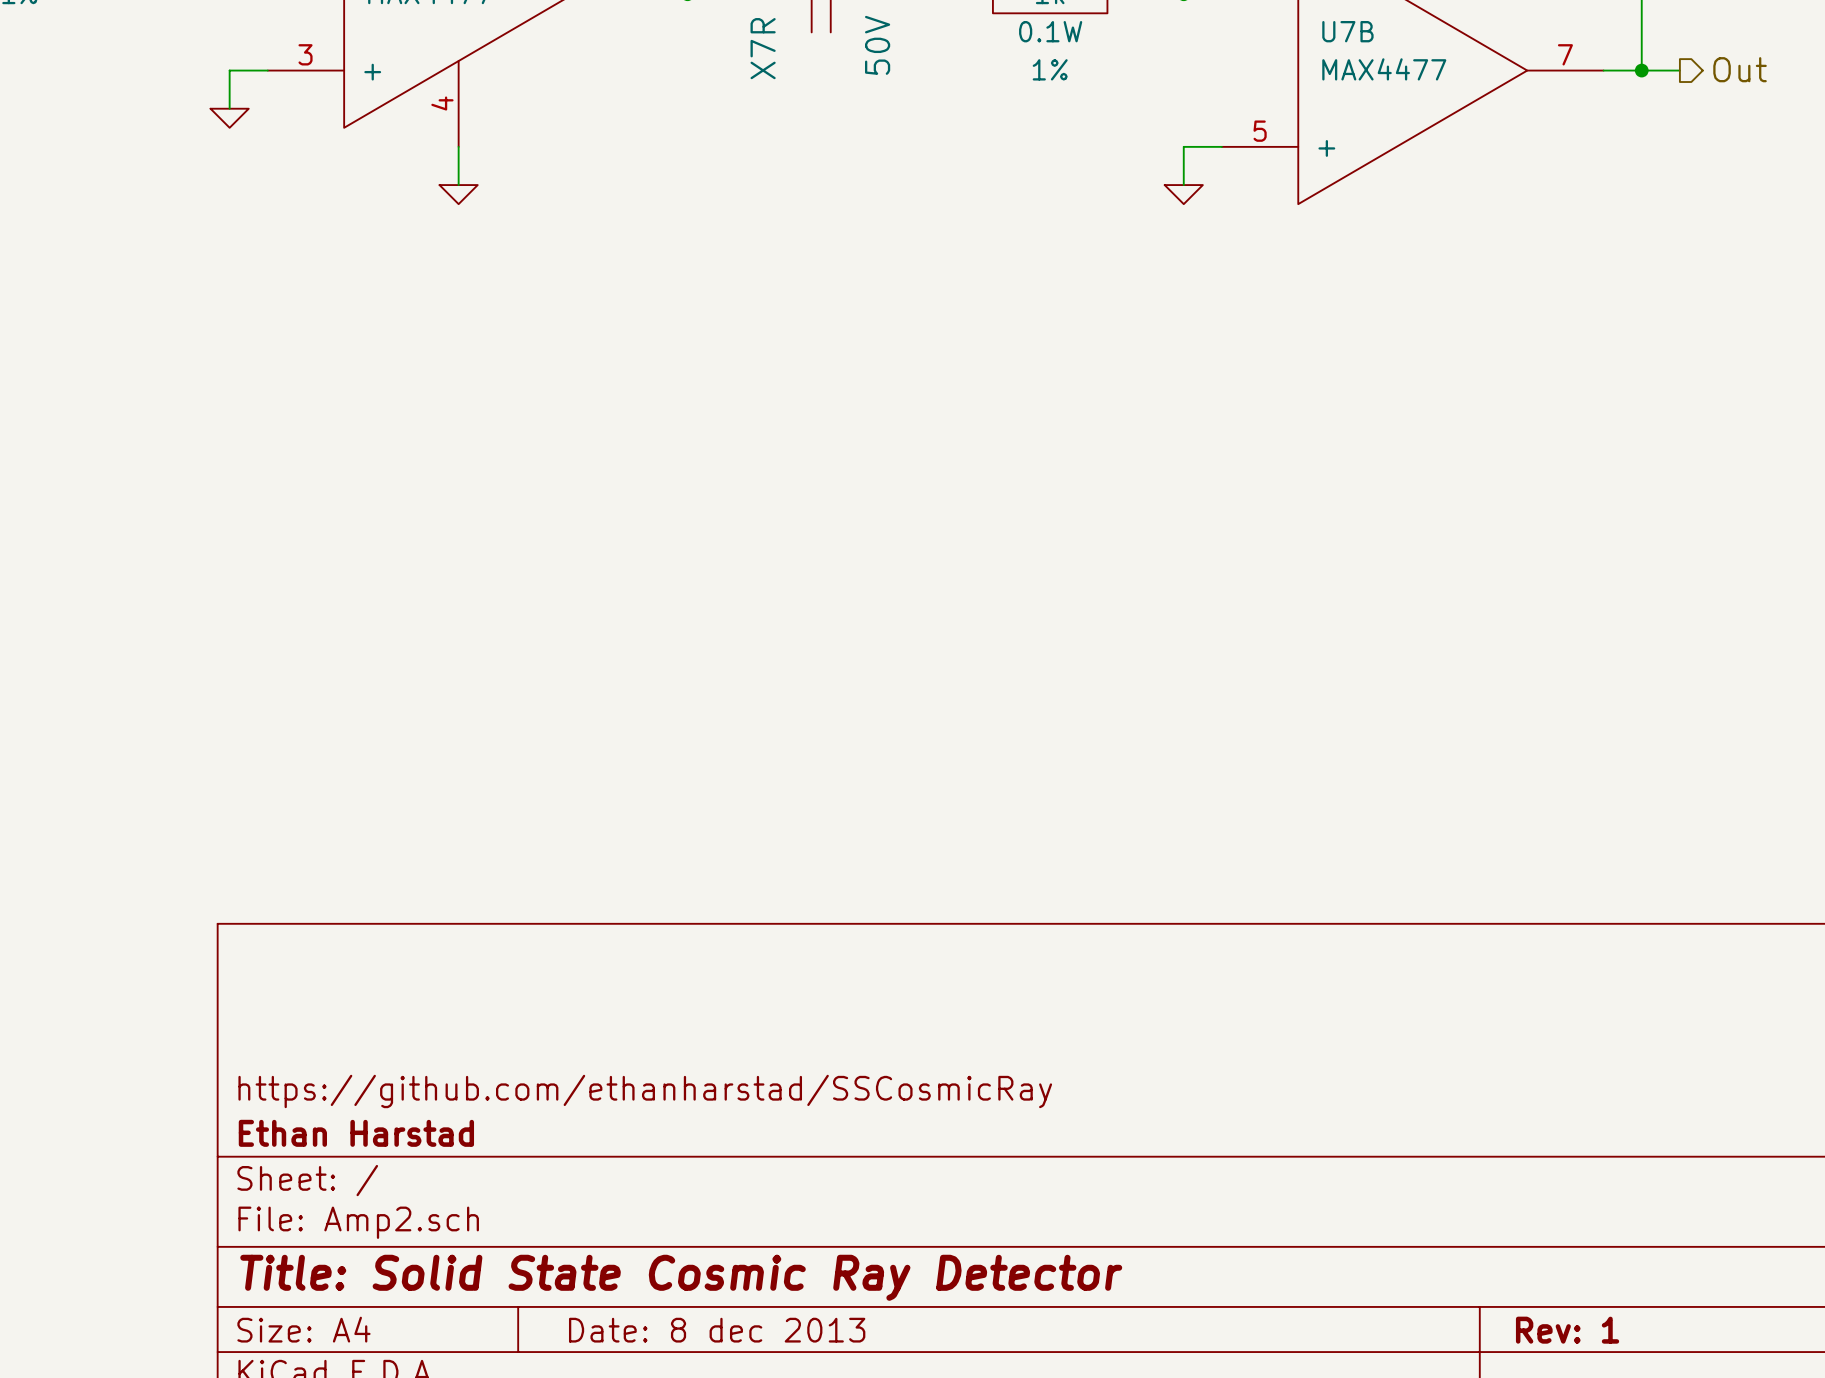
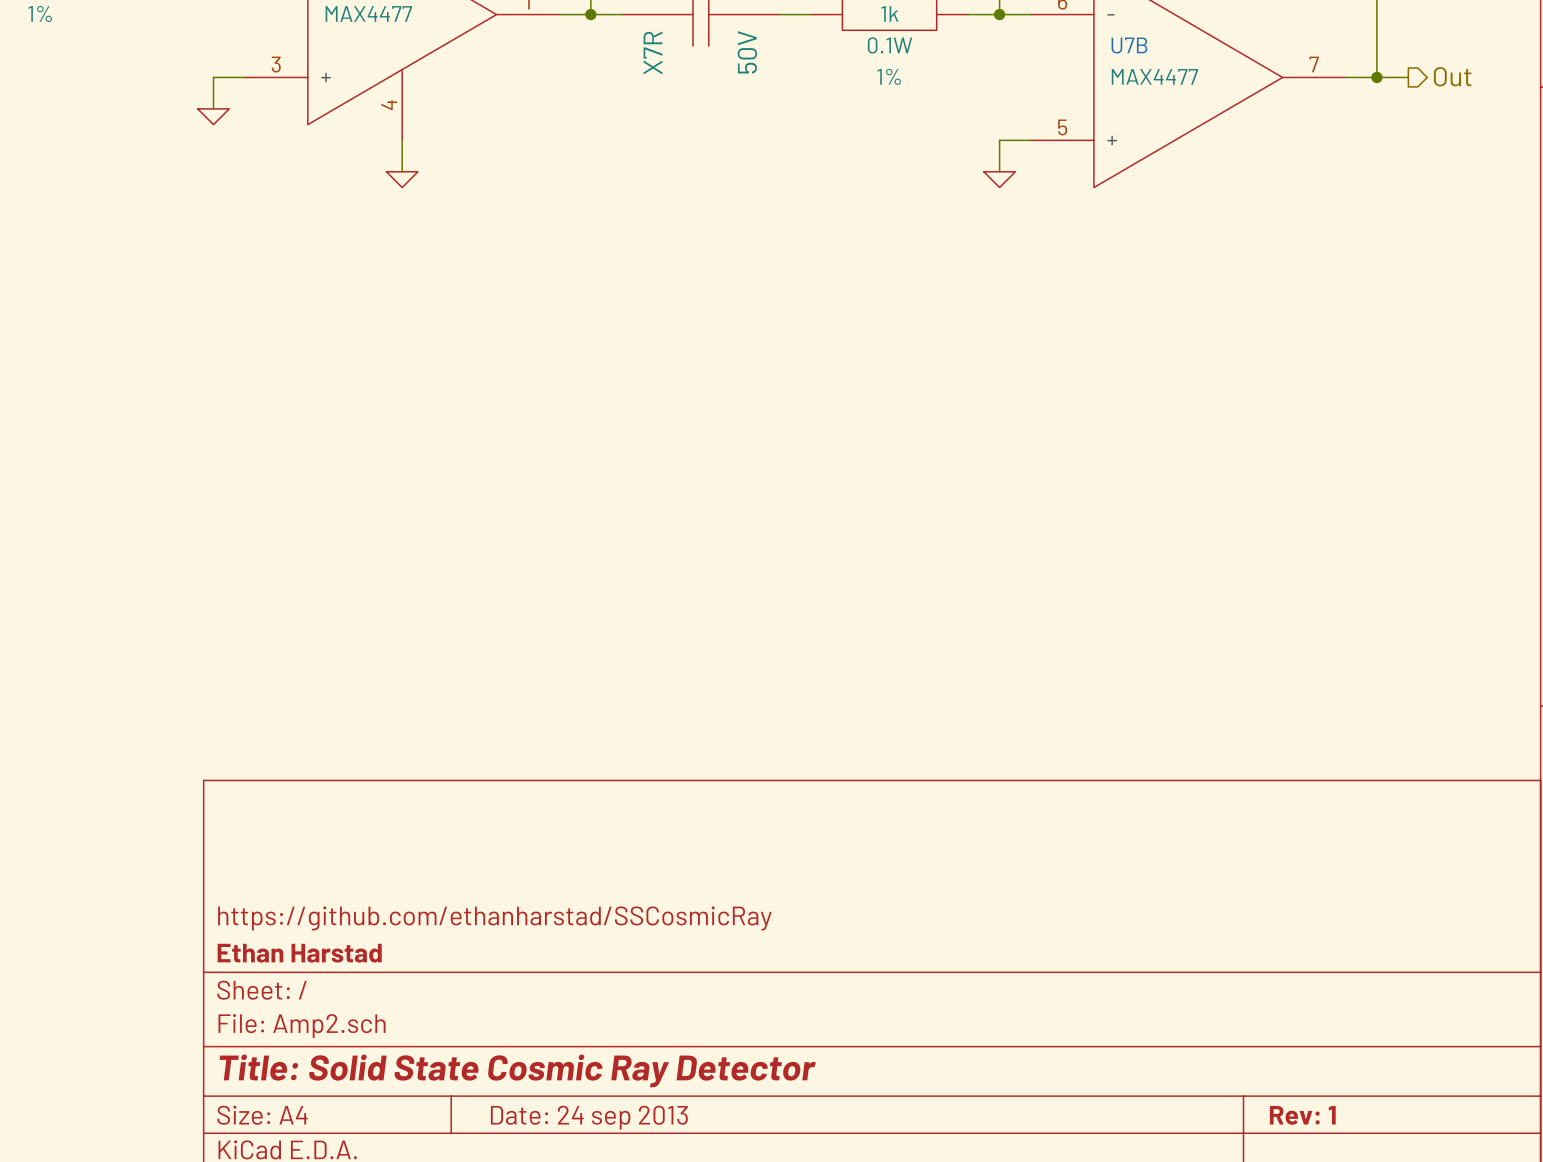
title block: Date: 8 dec 2013 (717, 1330) -> Date: 24 sep 2013 (589, 1117)

